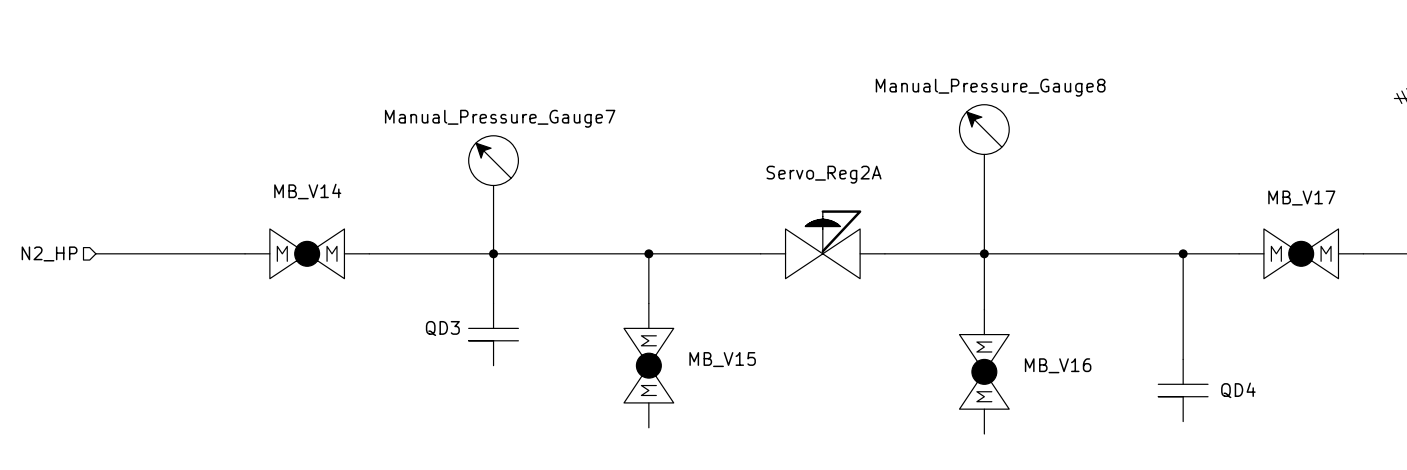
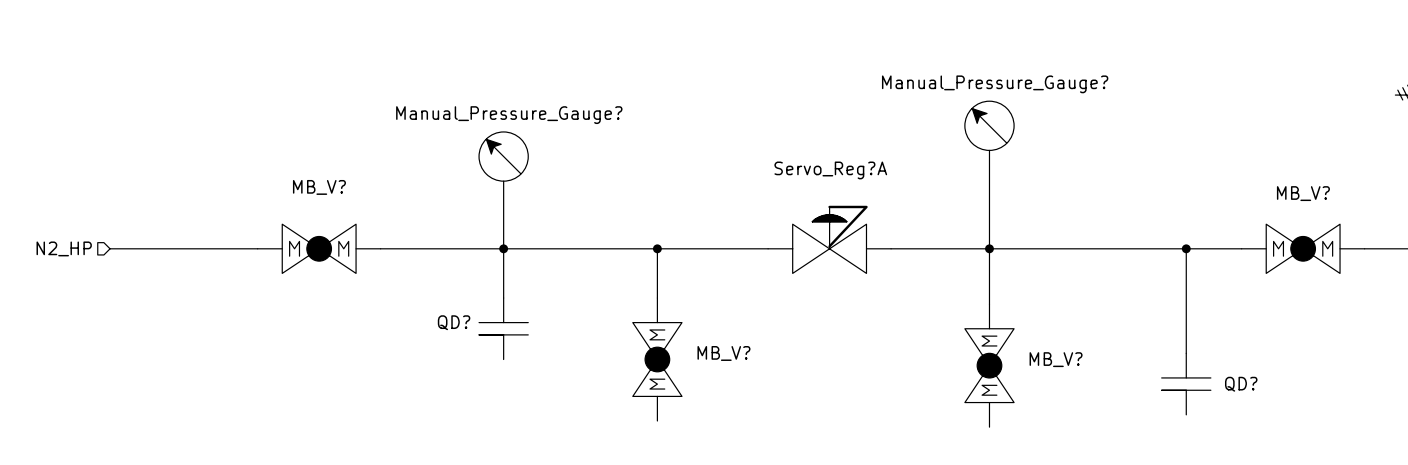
Manual_Pressure_Gauge8 name: Manual_Pressure_Gauge8 (990, 87) -> Manual_Pressure_Gauge? (995, 84)
Manual_Pressure_Gauge7 name: Manual_Pressure_Gauge7 (500, 118) -> Manual_Pressure_Gauge? (509, 115)
Servo_Reg2A name: Servo_Reg2A (824, 174) -> Servo_Reg?A (830, 170)
MB_V14 name: MB_V14 (307, 191) -> MB_V? (319, 187)
MB_V17 name: MB_V17 (1301, 198) -> MB_V? (1303, 193)
QD3 name: QD3 (442, 328) -> QD? (454, 322)
MB_V15 name: MB_V15 (722, 359) -> MB_V? (723, 353)
MB_V16 name: MB_V16 (1058, 365) -> MB_V? (1056, 359)
QD4 name: QD4 (1238, 390) -> QD? (1241, 384)

